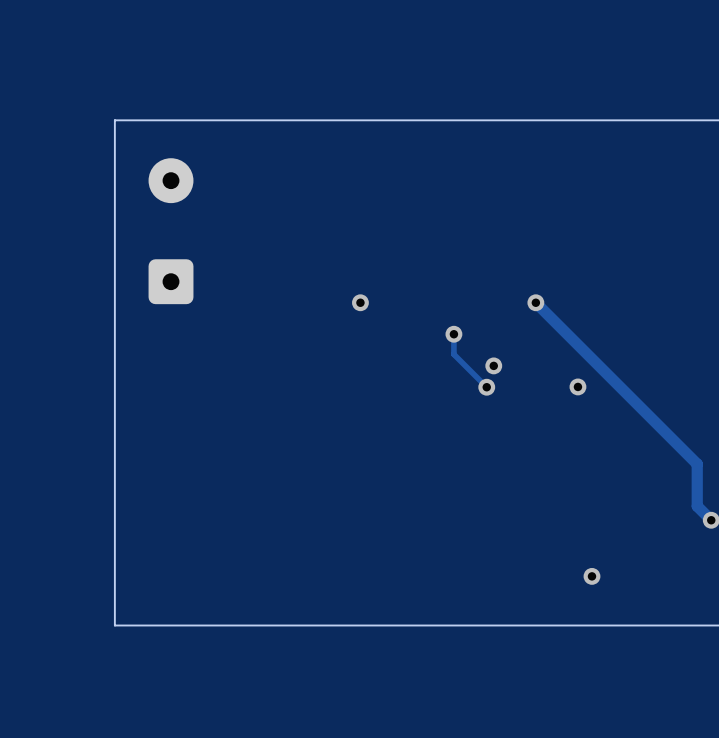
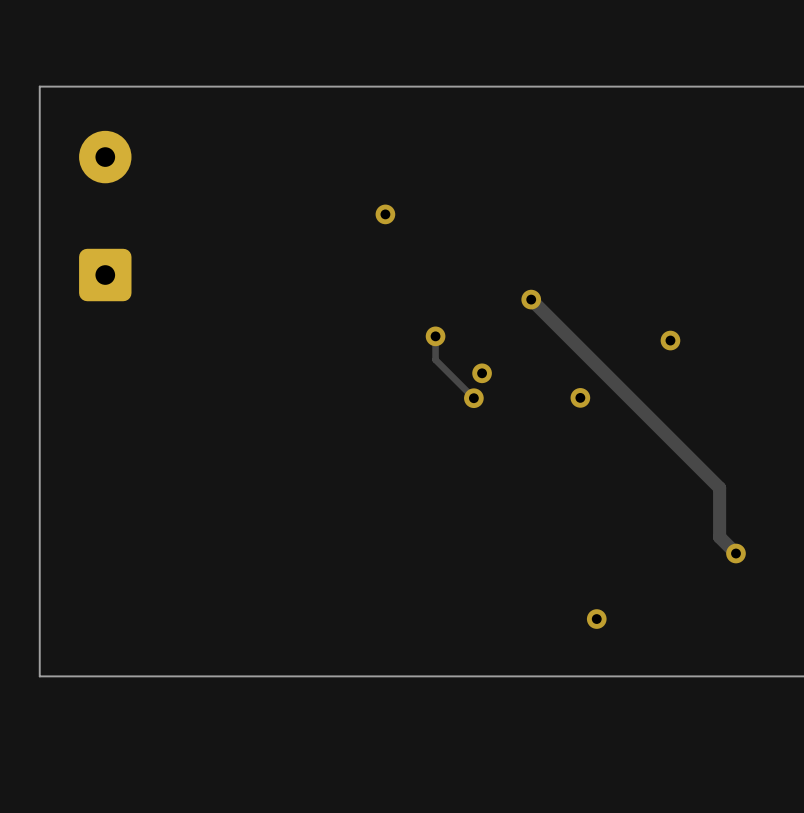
via position: (360, 302) -> (385, 214)
via: none -> (670, 340)

